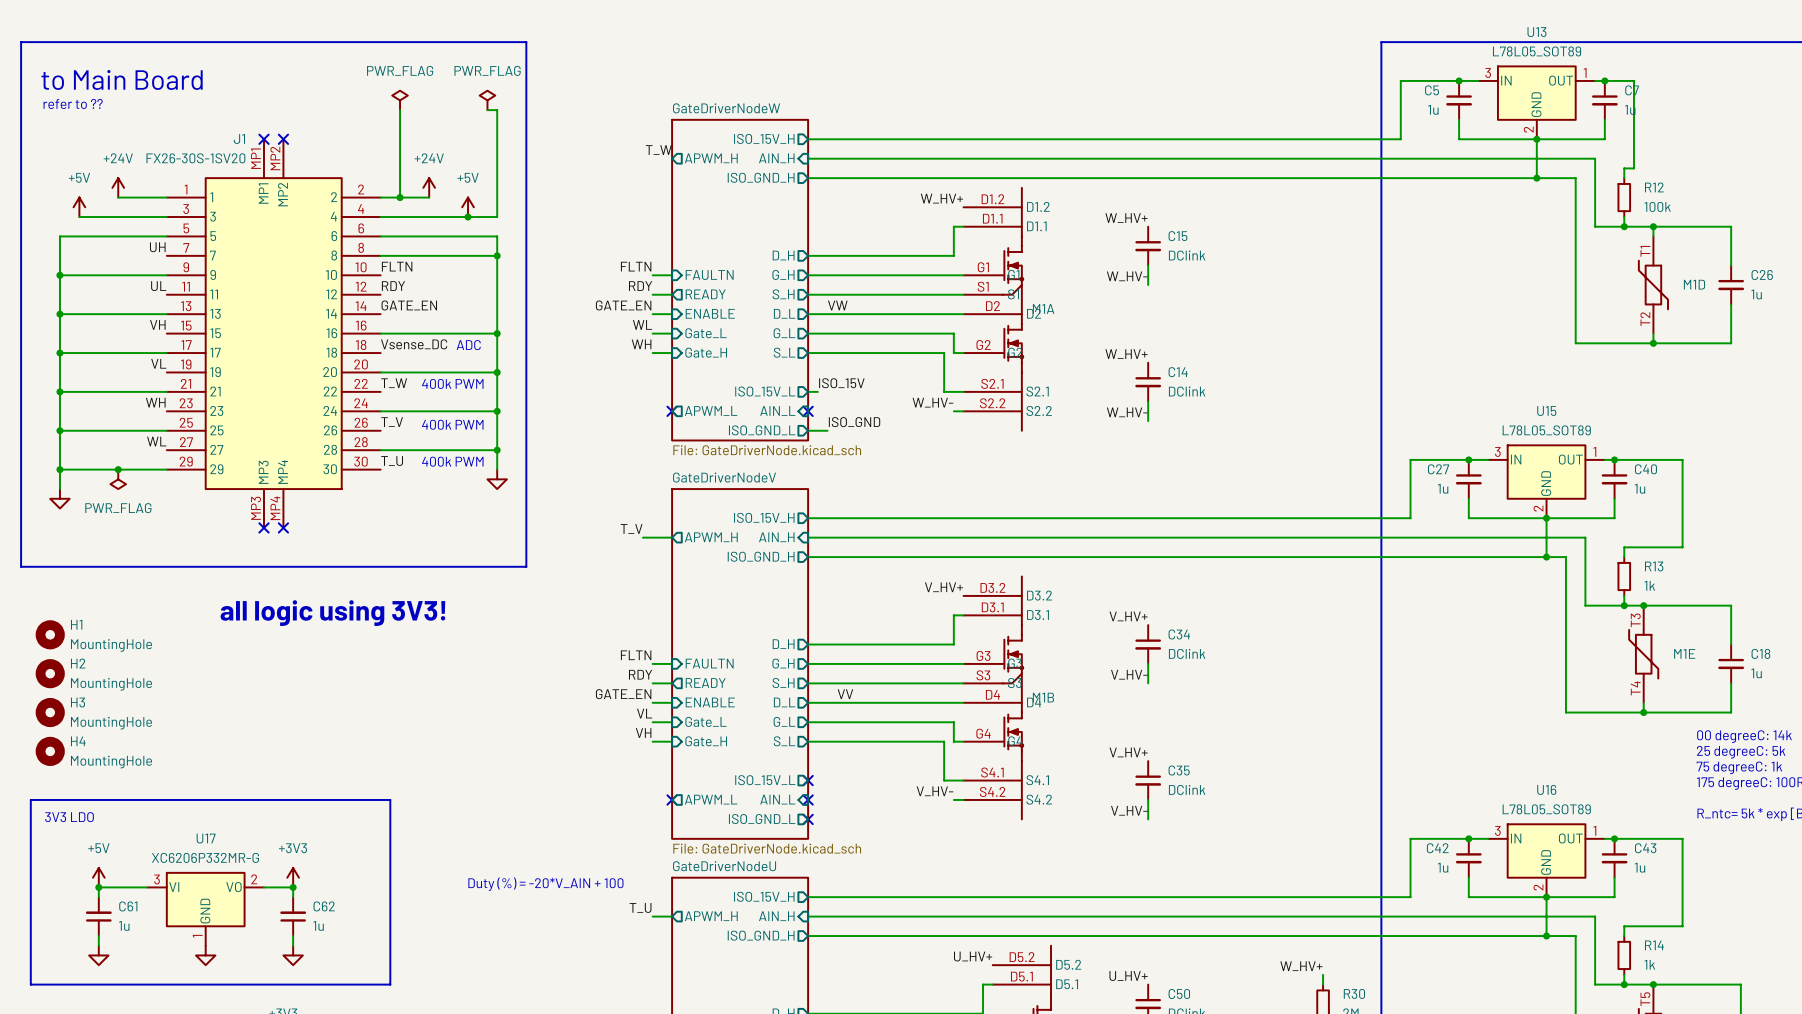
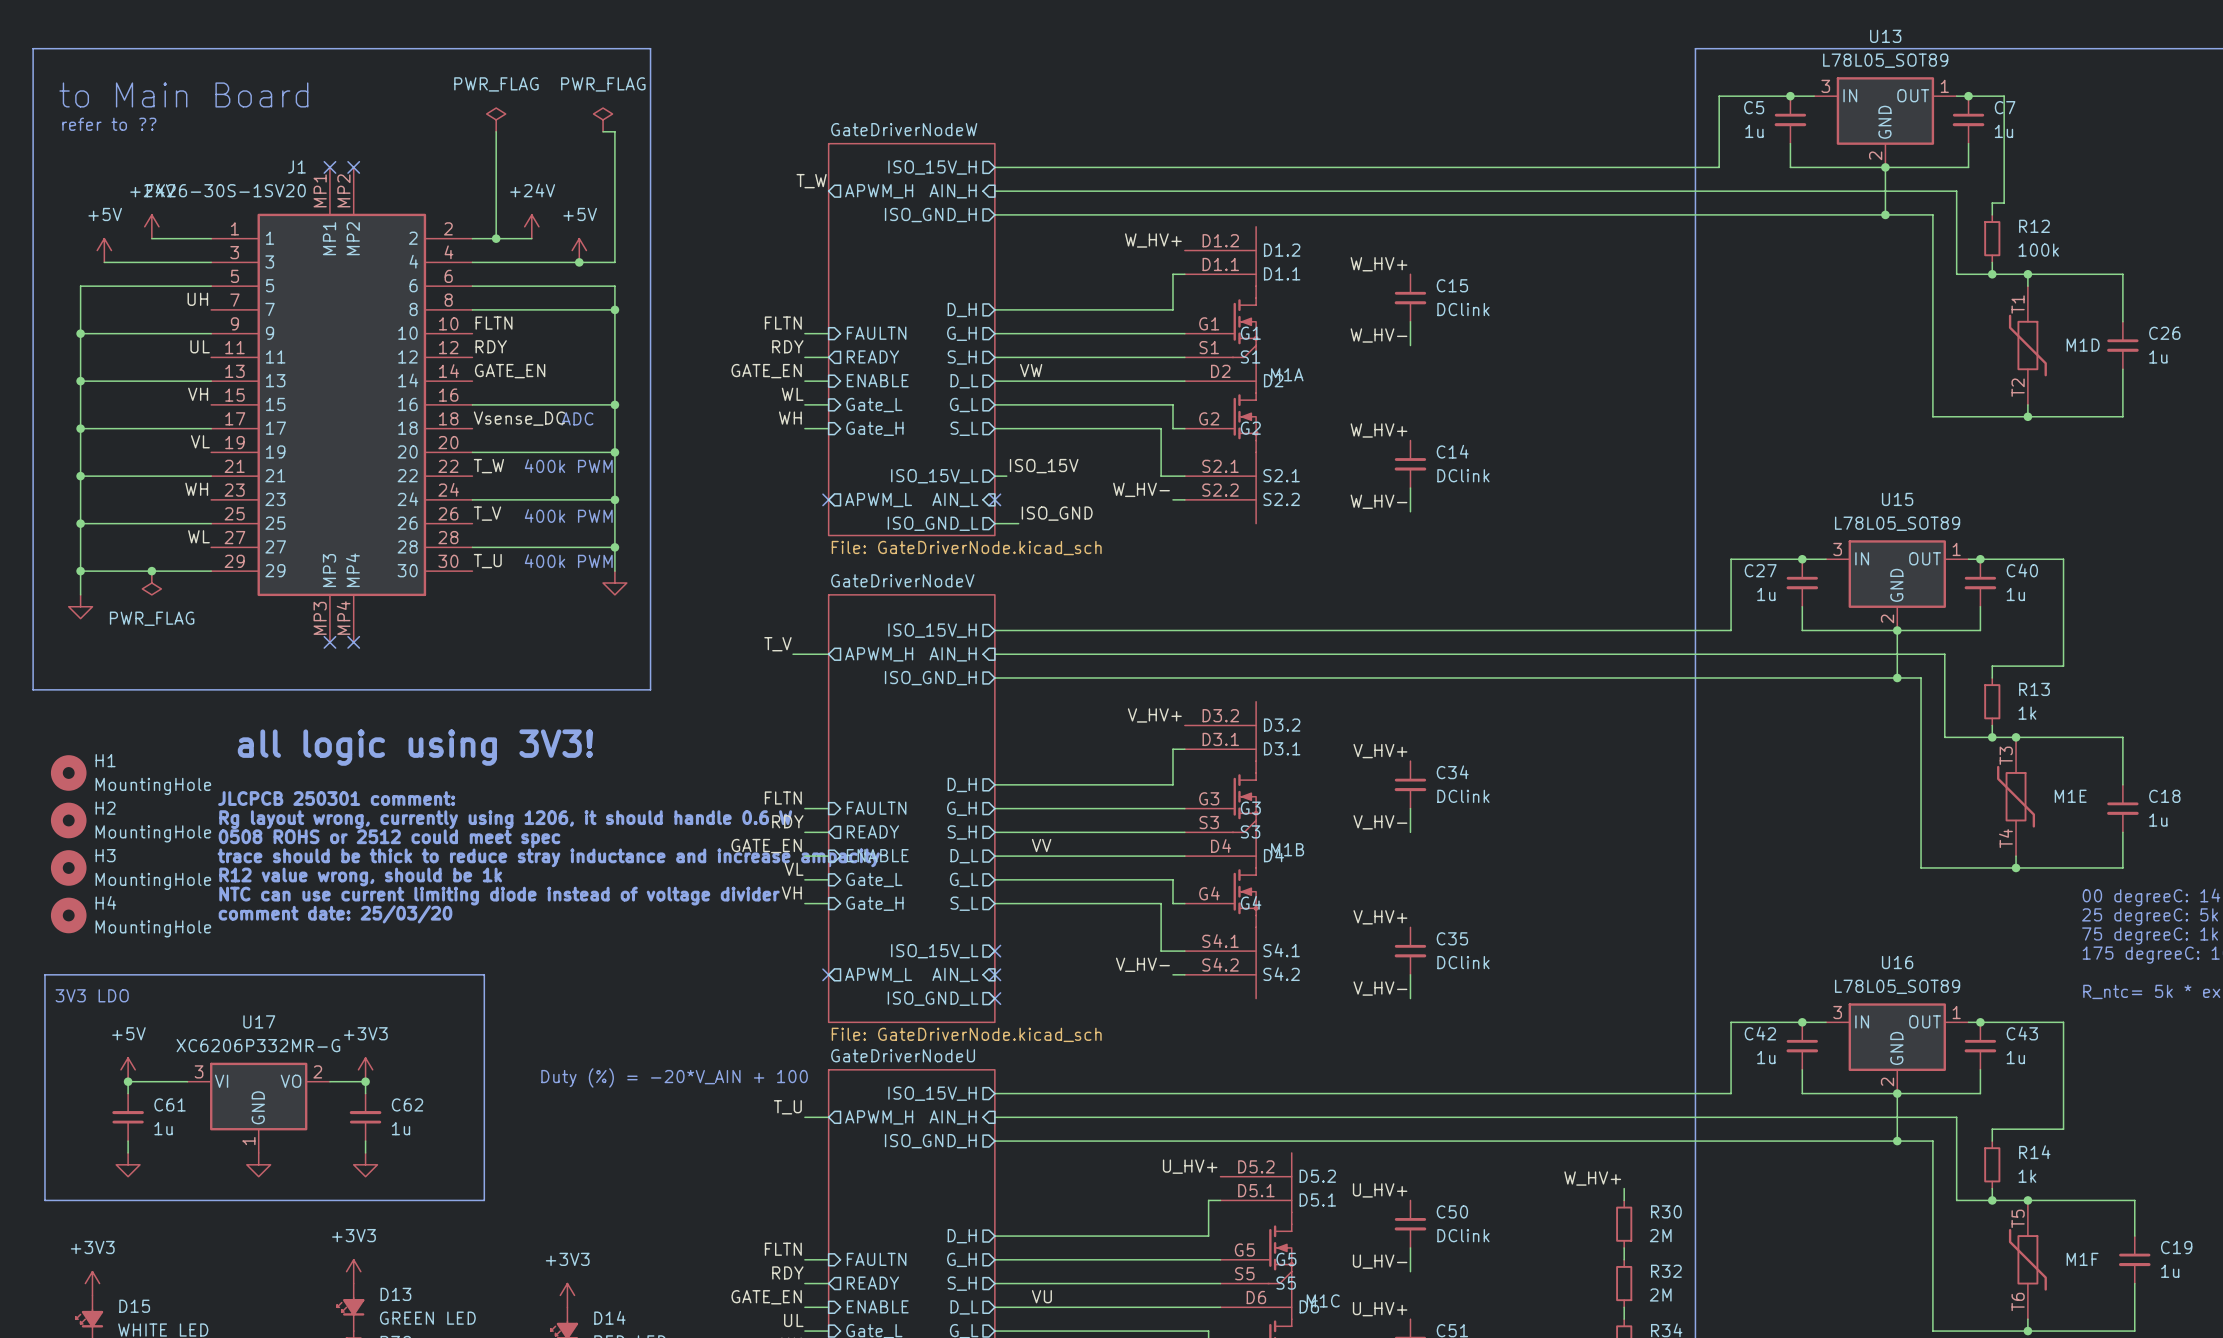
text: none -> JLCPCB 250301 comment: (336, 798)
text: none -> Rg layout wrong, currently using 1206, it should handle 0.6 W (505, 819)
text: none -> 0508 ROHS or 2512 could meet spec (389, 838)
text: none -> trace should be thick to reduce stray inductance and increase ampacity (548, 857)
text: none -> R12 value wrong, should be 1k (360, 876)
text: none -> NTC can use current limiting diode instead of voltage divider (499, 896)
text: none -> comment date: 25/03/20 (335, 914)

